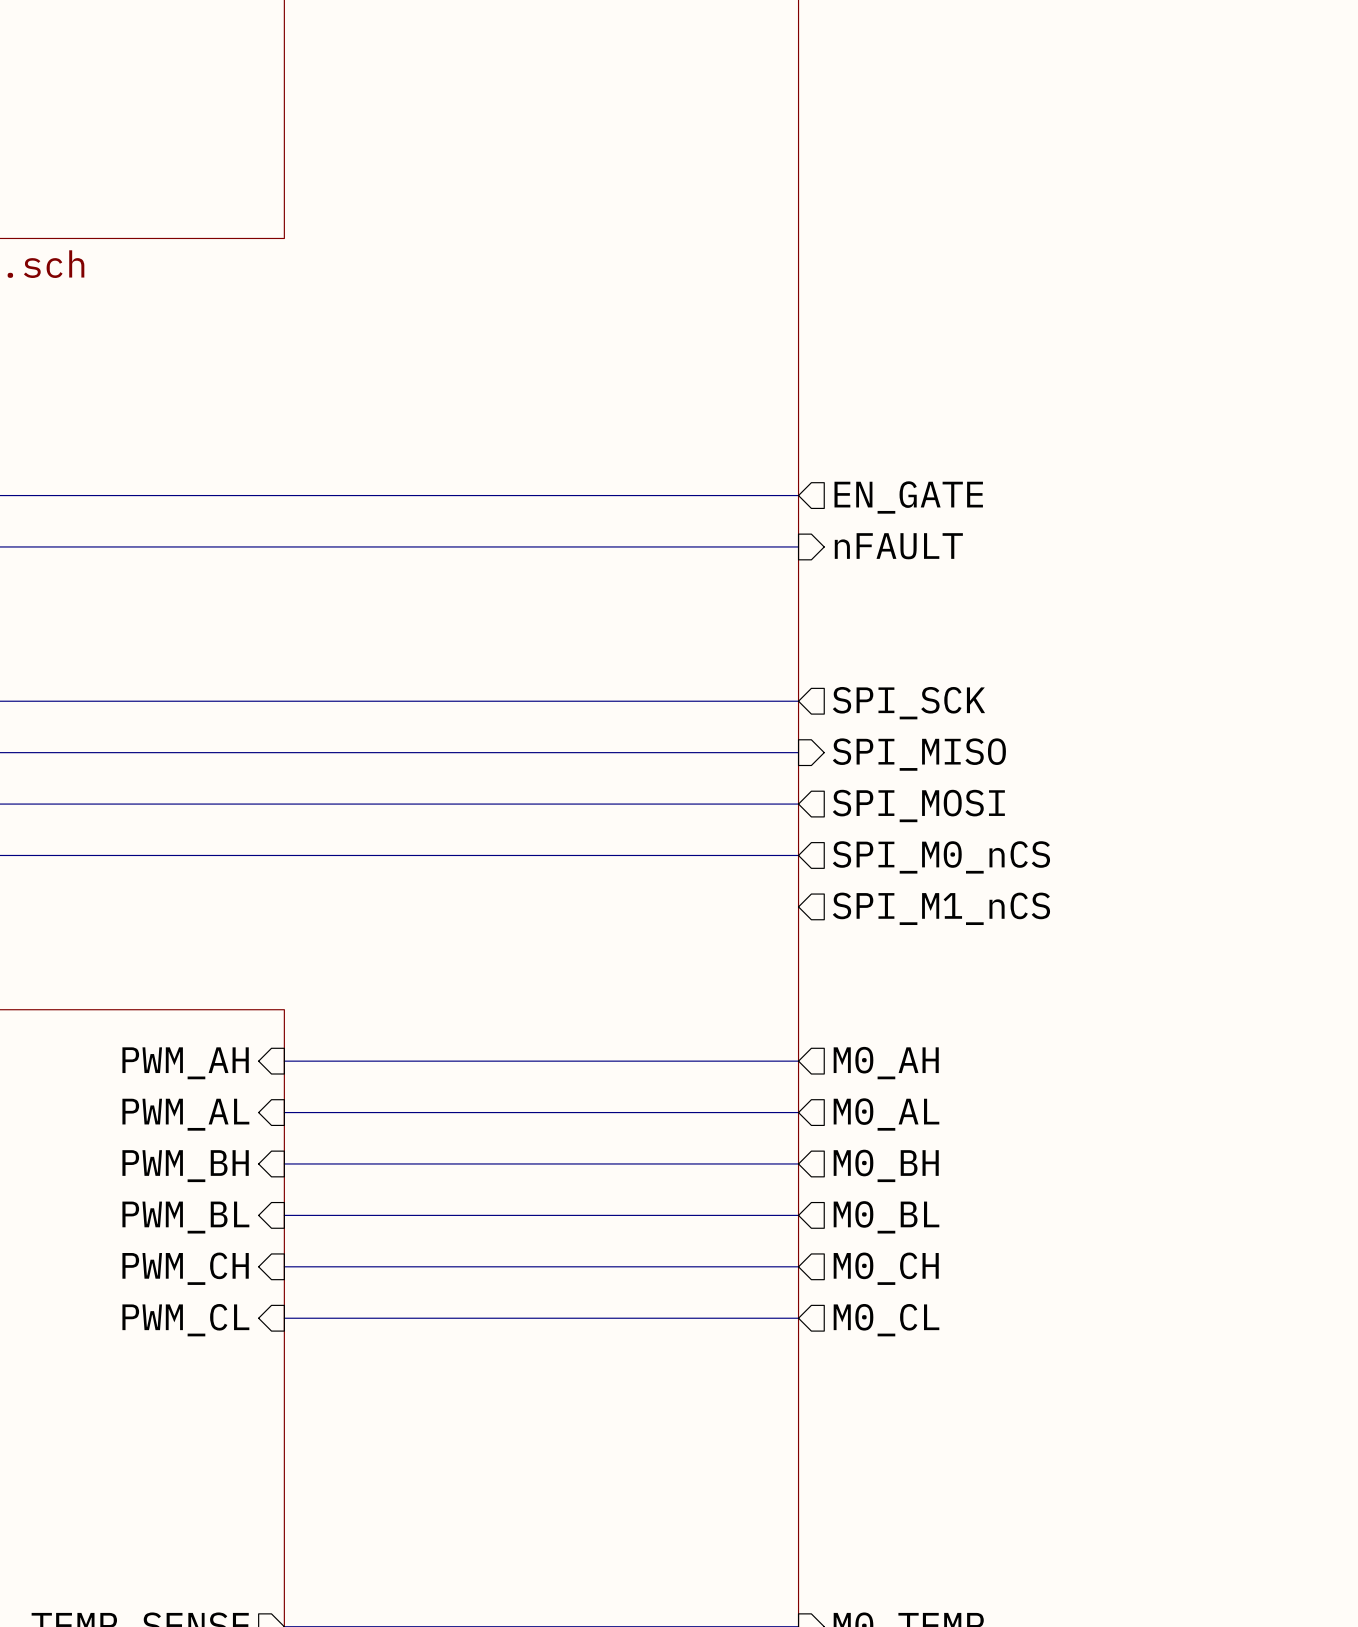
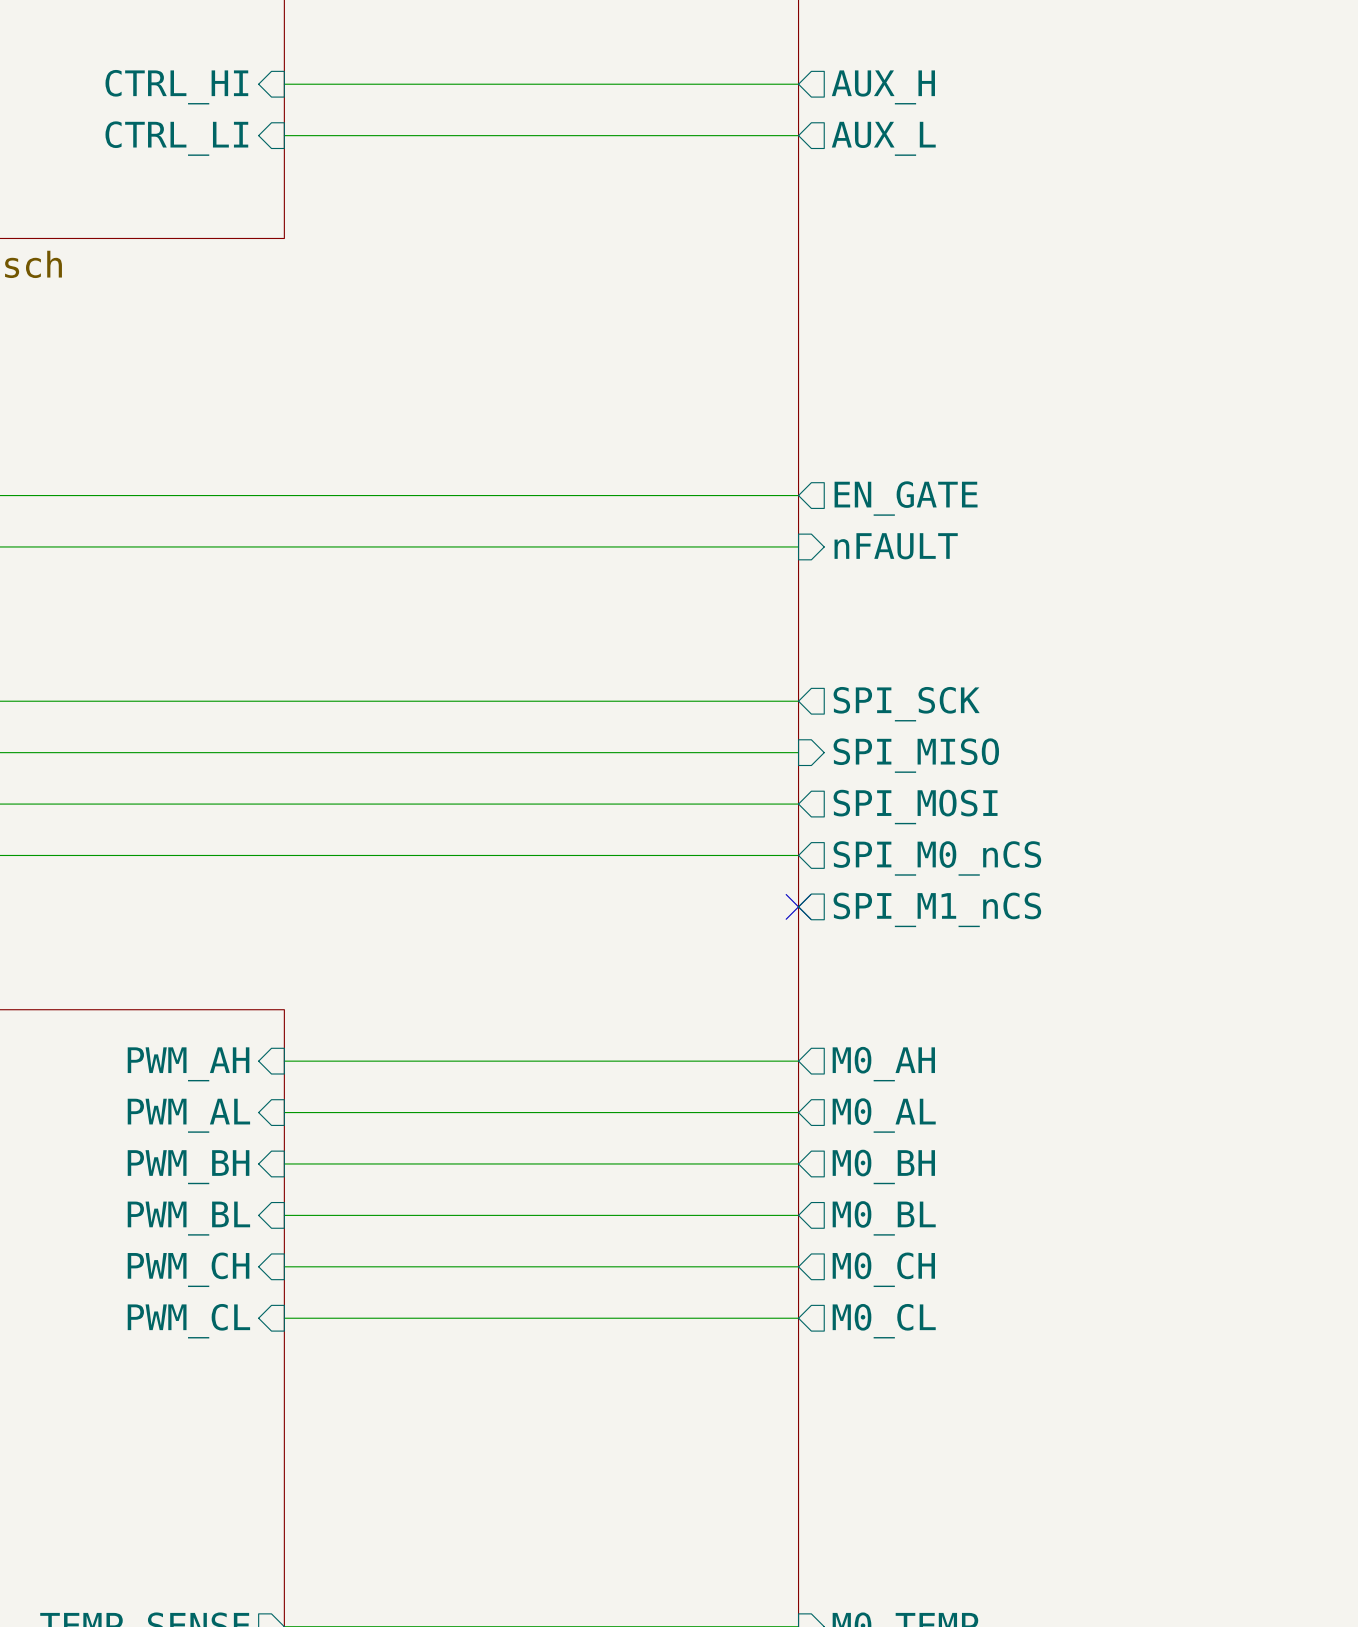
wire: none -> (284, 84) (798, 84)
sheet pin: none -> CTRL_HI (176, 87)
sheet pin: none -> AUX_H (883, 87)
wire: none -> (284, 135) (798, 135)
sheet pin: none -> CTRL_LI (176, 138)
sheet pin: none -> AUX_L (883, 138)
no-connect mark: none -> (798, 906)

